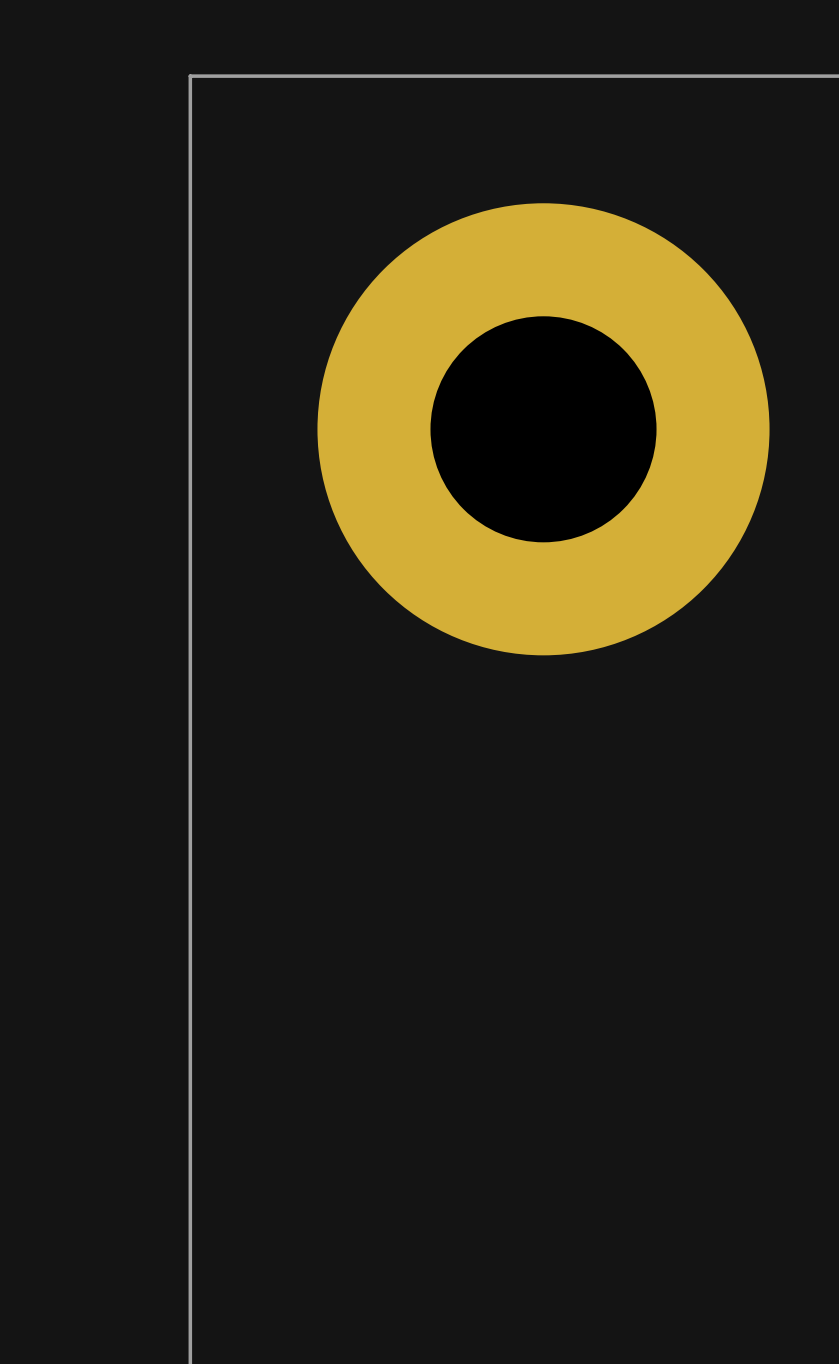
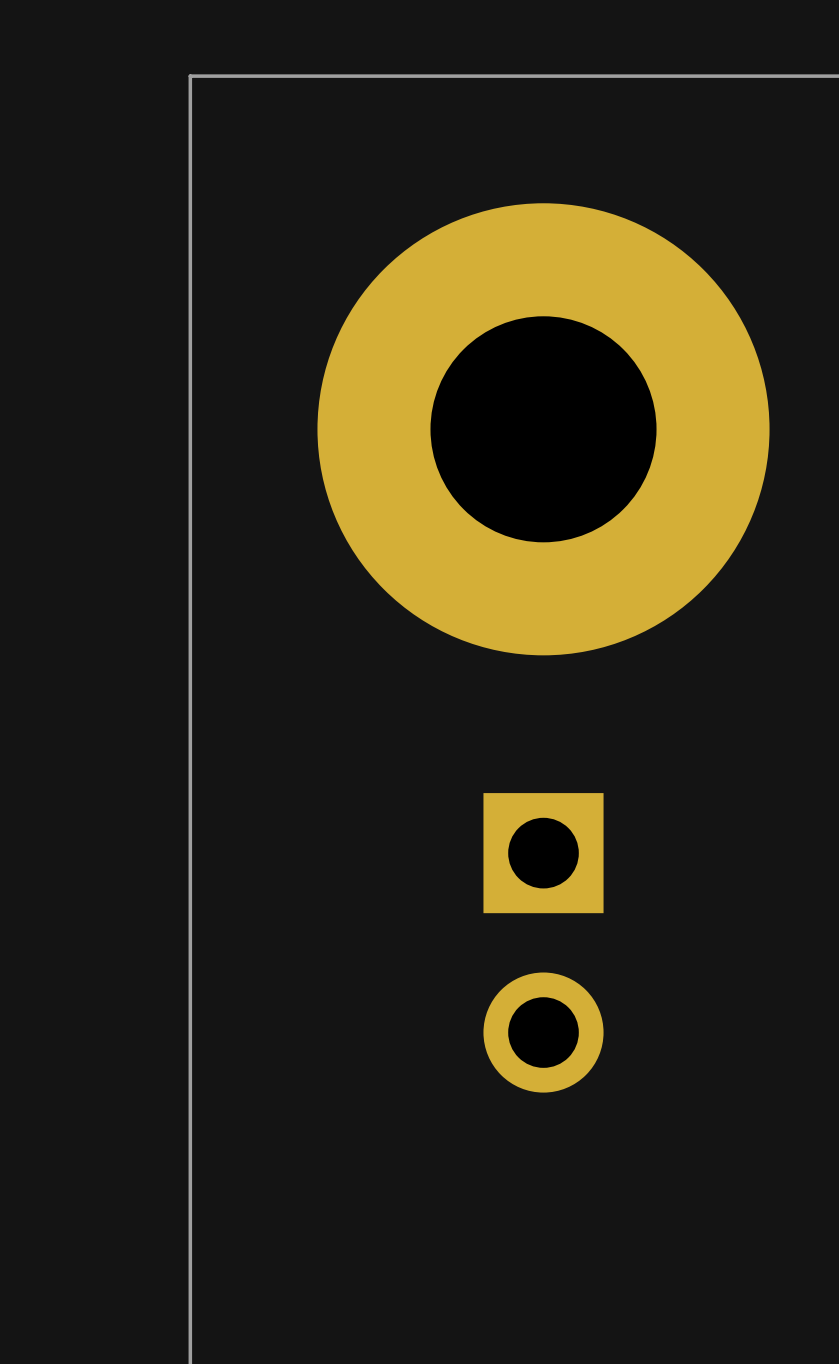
part: none -> (543, 942)

